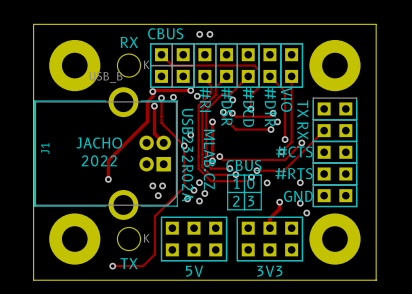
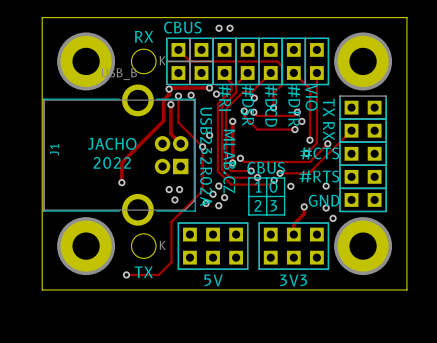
part side: bottom (74, 65) -> top (86, 61)
part side: bottom (334, 65) -> top (363, 61)
part side: bottom (74, 239) -> top (86, 246)
part side: bottom (334, 239) -> top (363, 246)

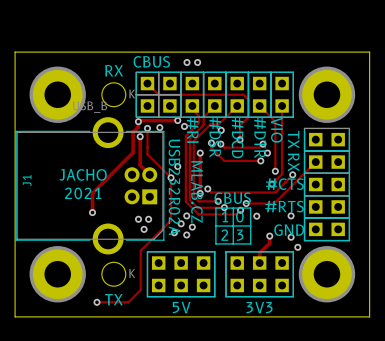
text: 2022 (112, 162) -> 2021 (83, 193)

